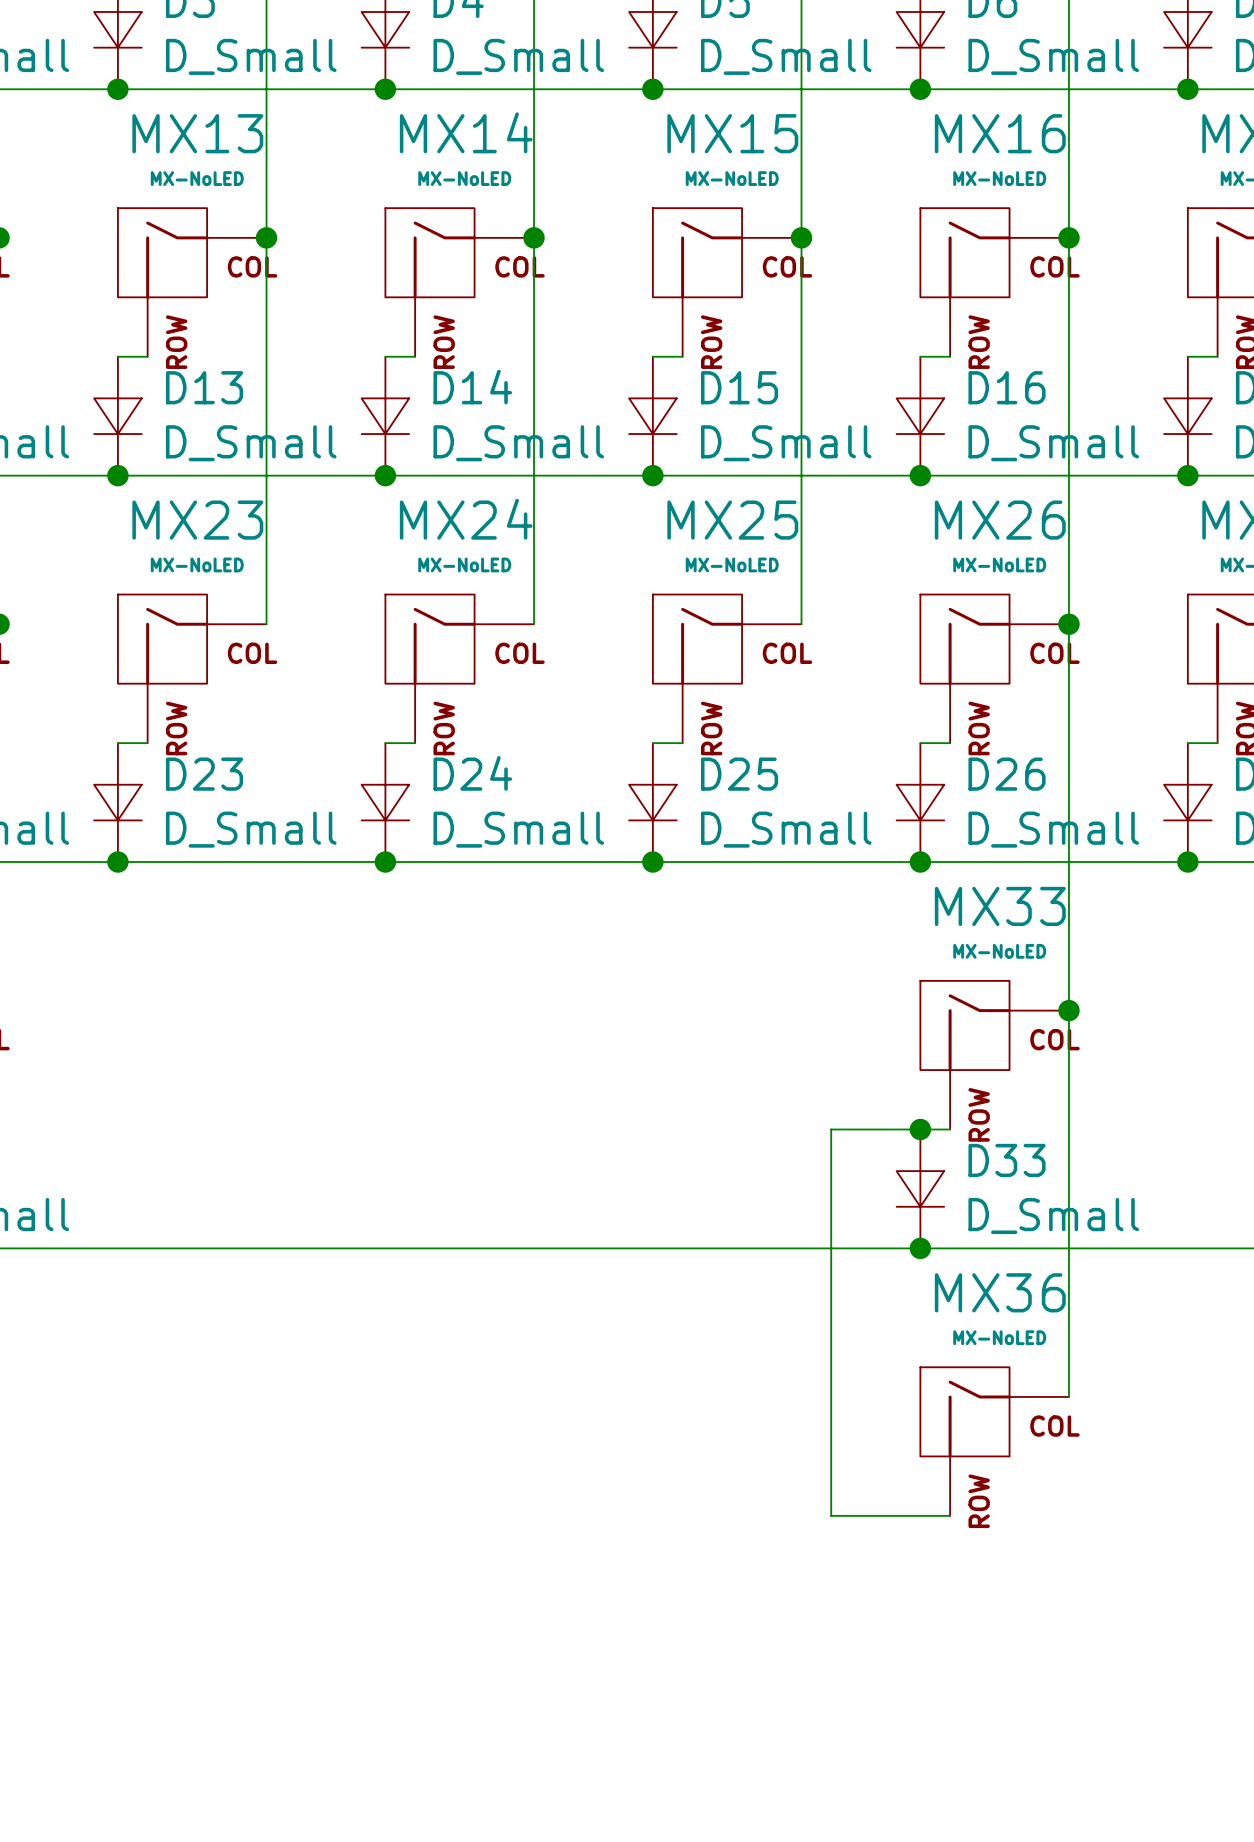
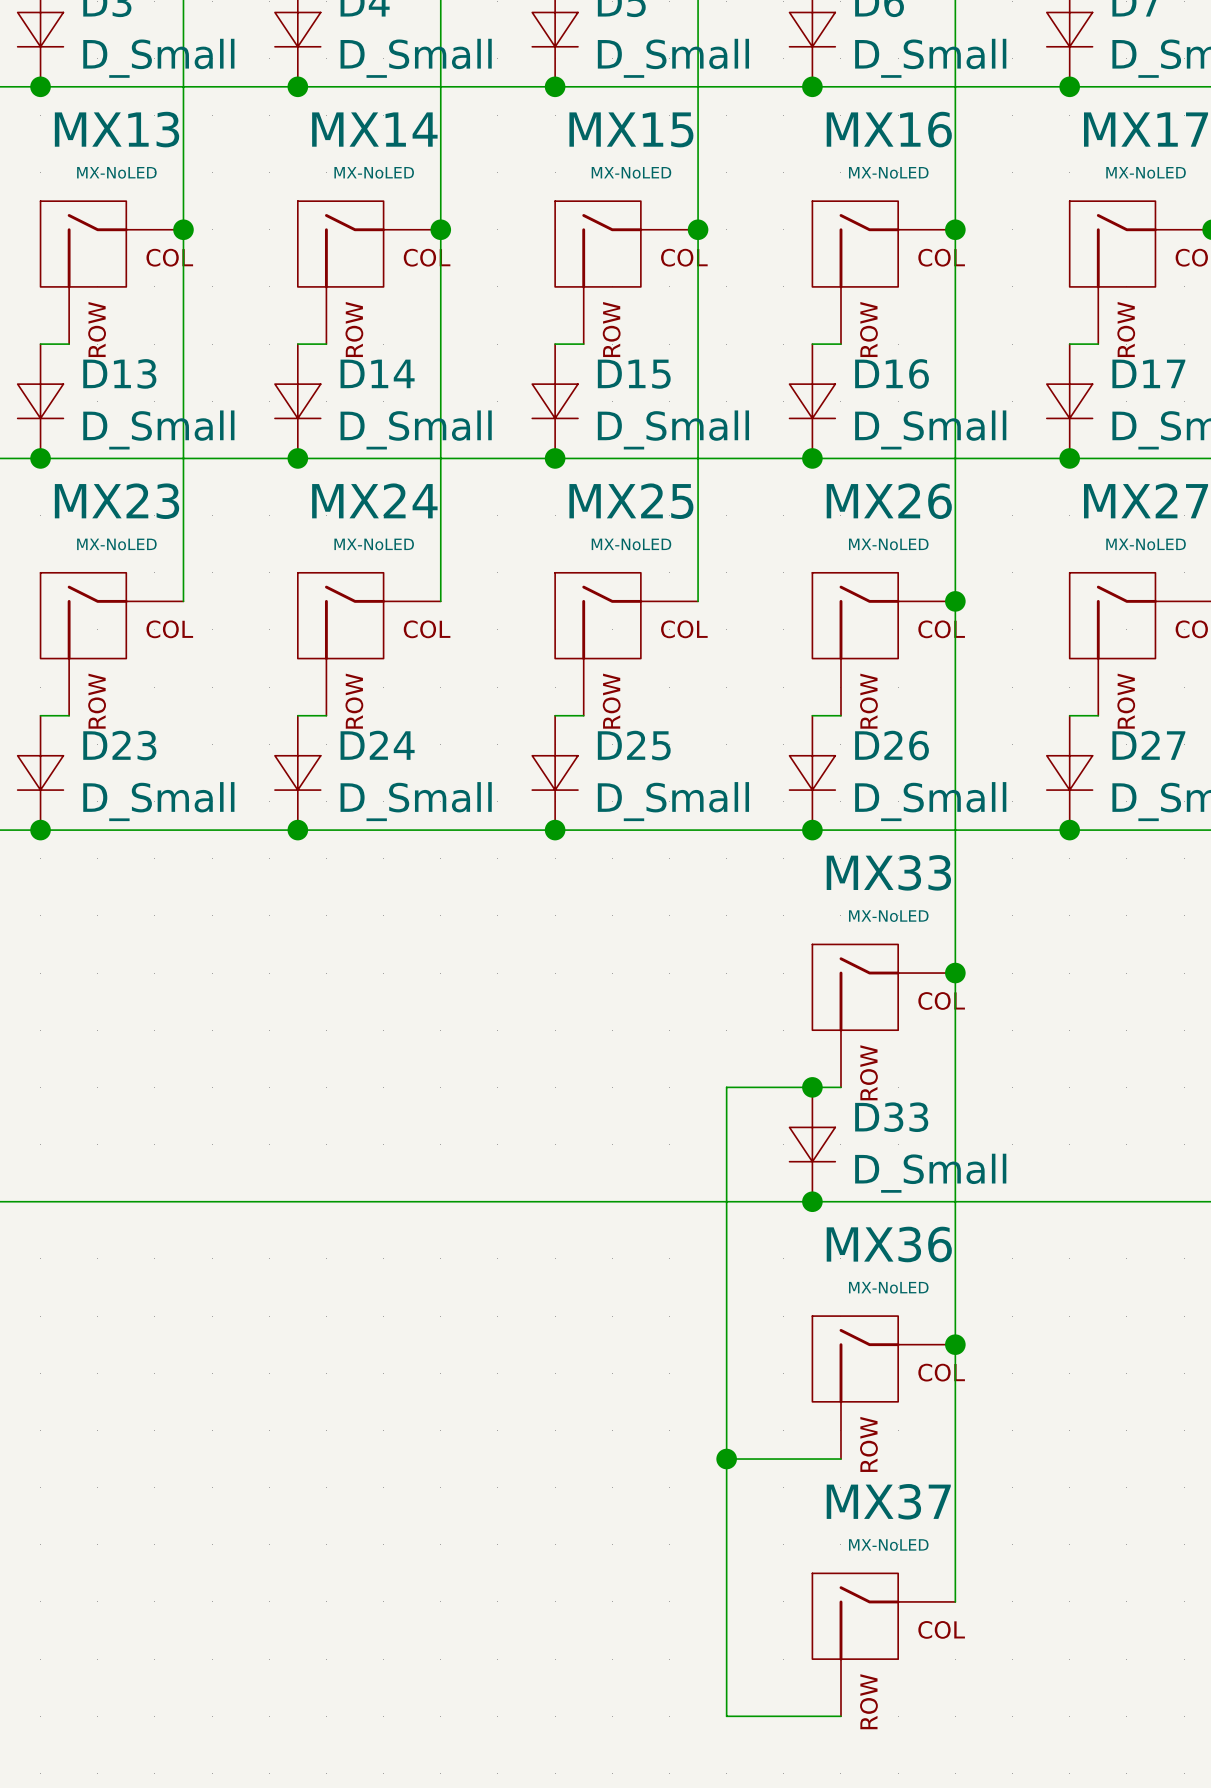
wire: none -> (955, 1344) (955, 1601)
junction: none -> (955, 1344)
wire: none -> (726, 1459) (726, 1716) (840, 1716)
junction: none -> (726, 1459)
MX37: none -> MX-NoLED (883, 1644)

